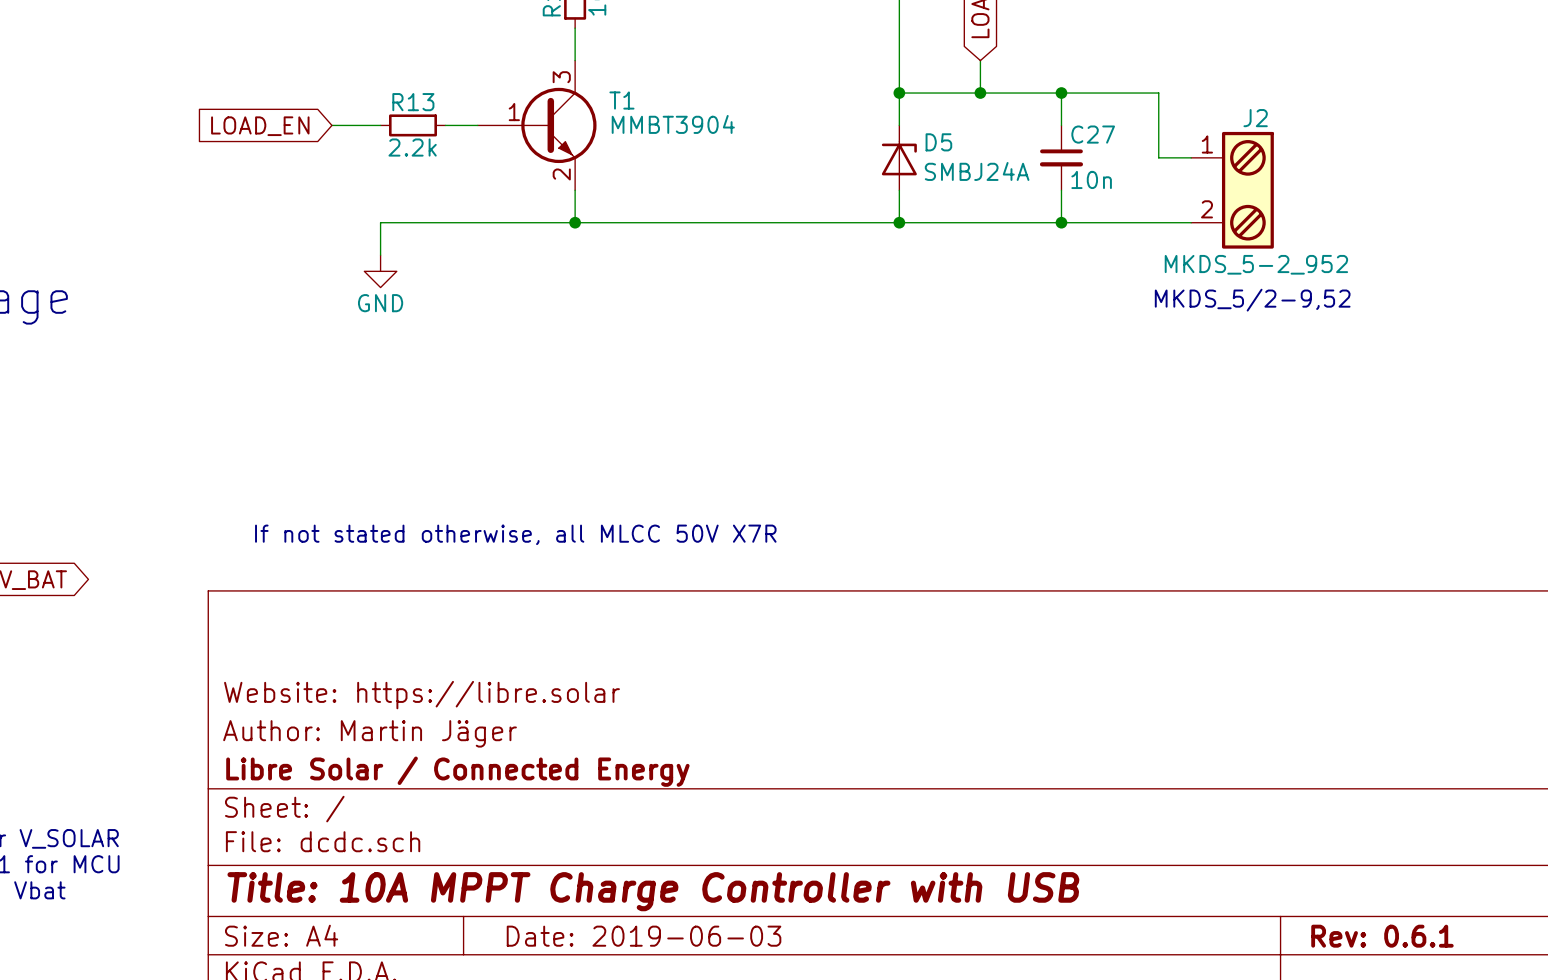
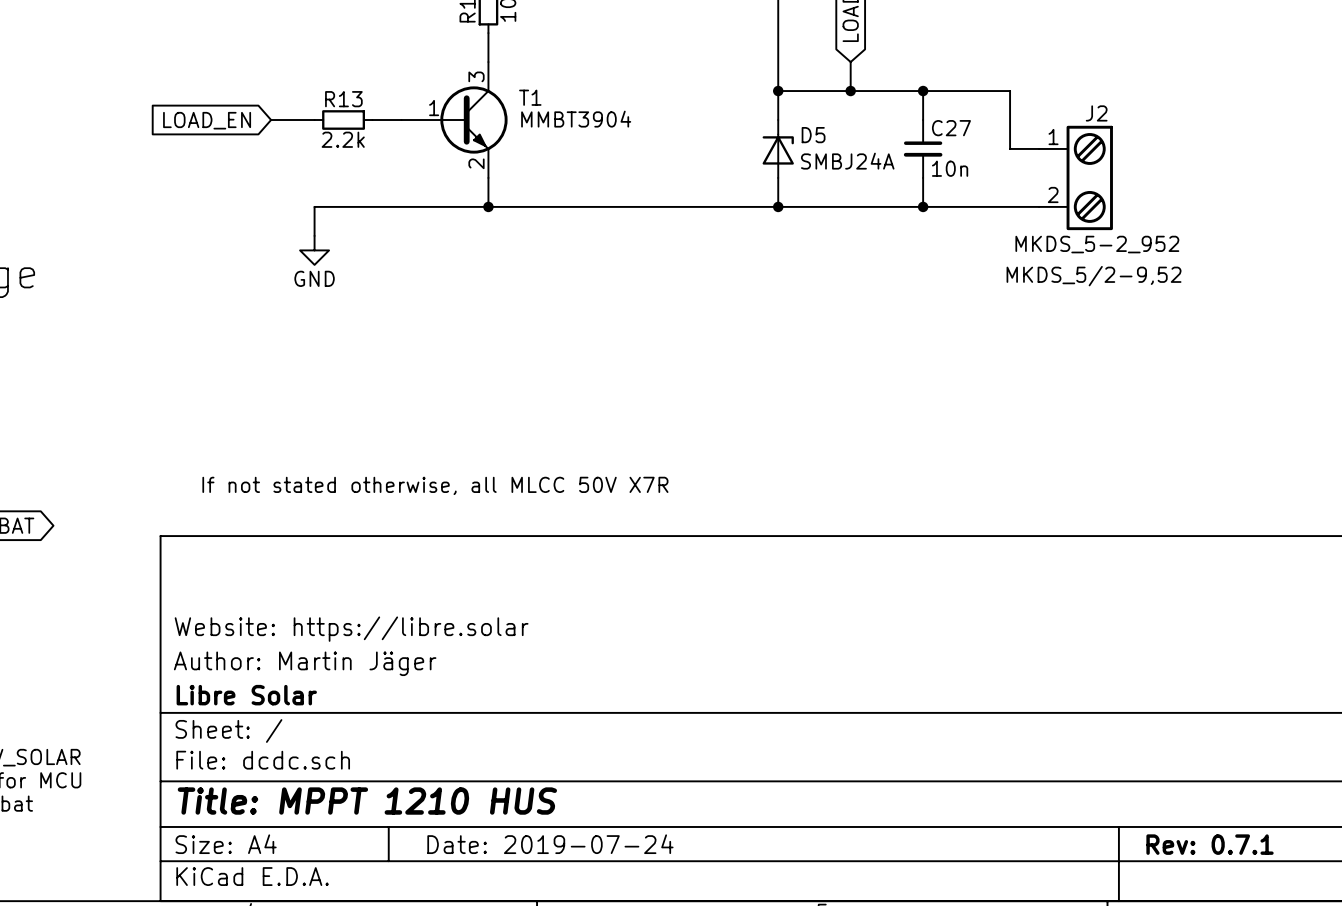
title block: Libre Solar / Connected Energy (457, 771) -> Libre Solar (246, 695)
title block: Title: 10A MPPT Charge Controller with USB (653, 891) -> Title: MPPT 1210 HUS (367, 801)
title block: Date: 2019-06-03 (644, 936) -> Date: 2019-07-24 (550, 844)
title block: Rev: 0.6.1 (1382, 936) -> Rev: 0.7.1 (1210, 844)

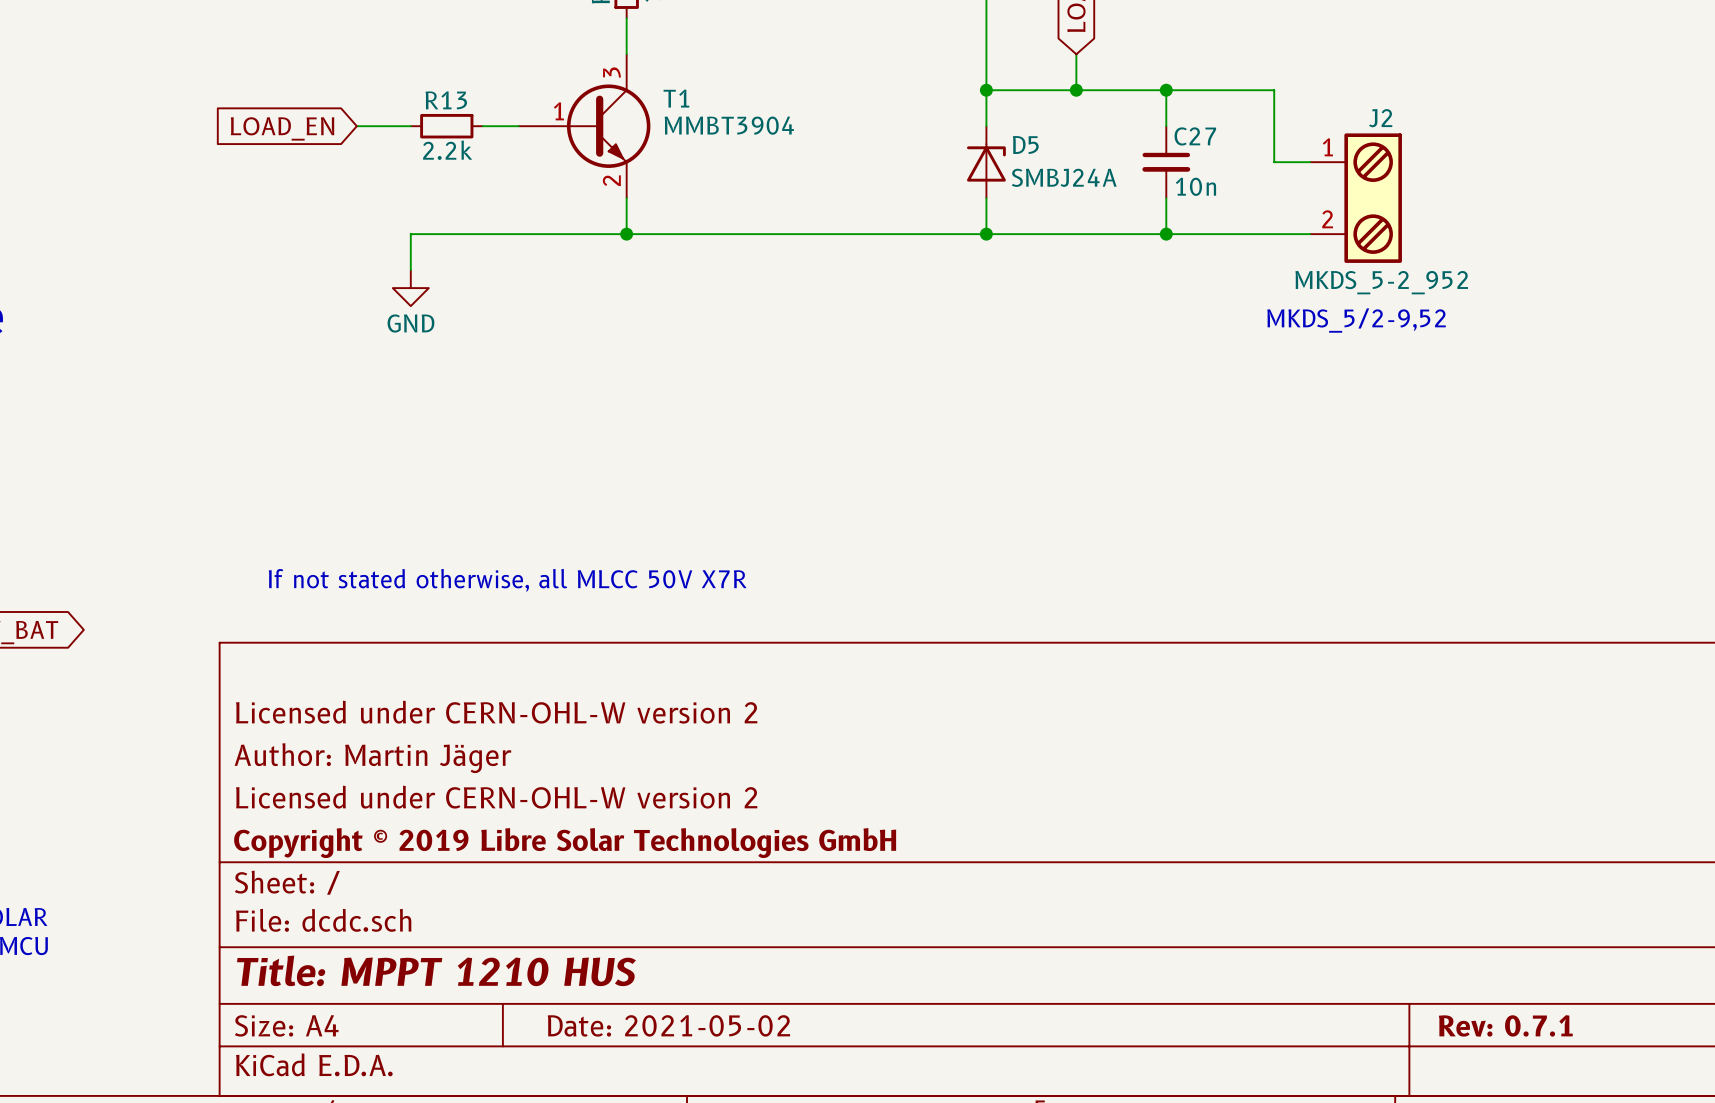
title block: none -> Licensed under CERN-OHL-W version 2 (496, 712)
title block: Website: https://libre.solar (351, 629) -> Author: Martin Jäger (372, 758)
title block: Author: Martin Jäger (305, 663) -> Licensed under CERN-OHL-W version 2 (496, 797)
title block: Libre Solar (246, 695) -> Copyright © 2019 Libre Solar Technologies GmbH (565, 843)
title block: Date: 2019-07-24 (550, 844) -> Date: 2021-05-02 (668, 1025)

